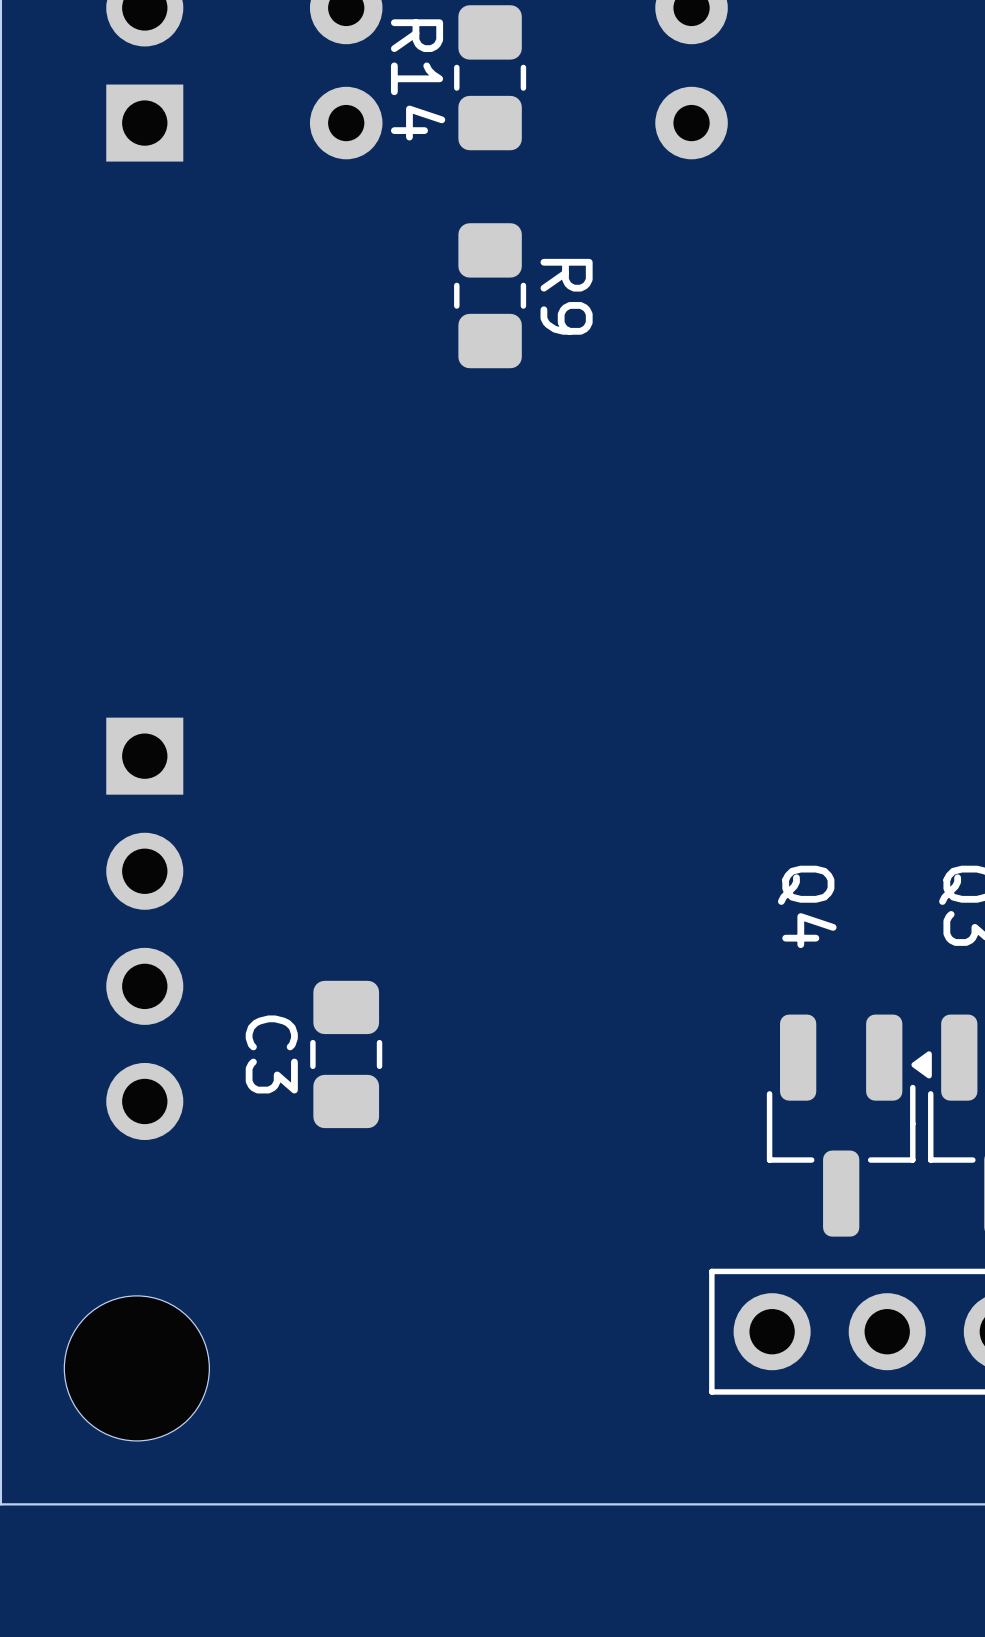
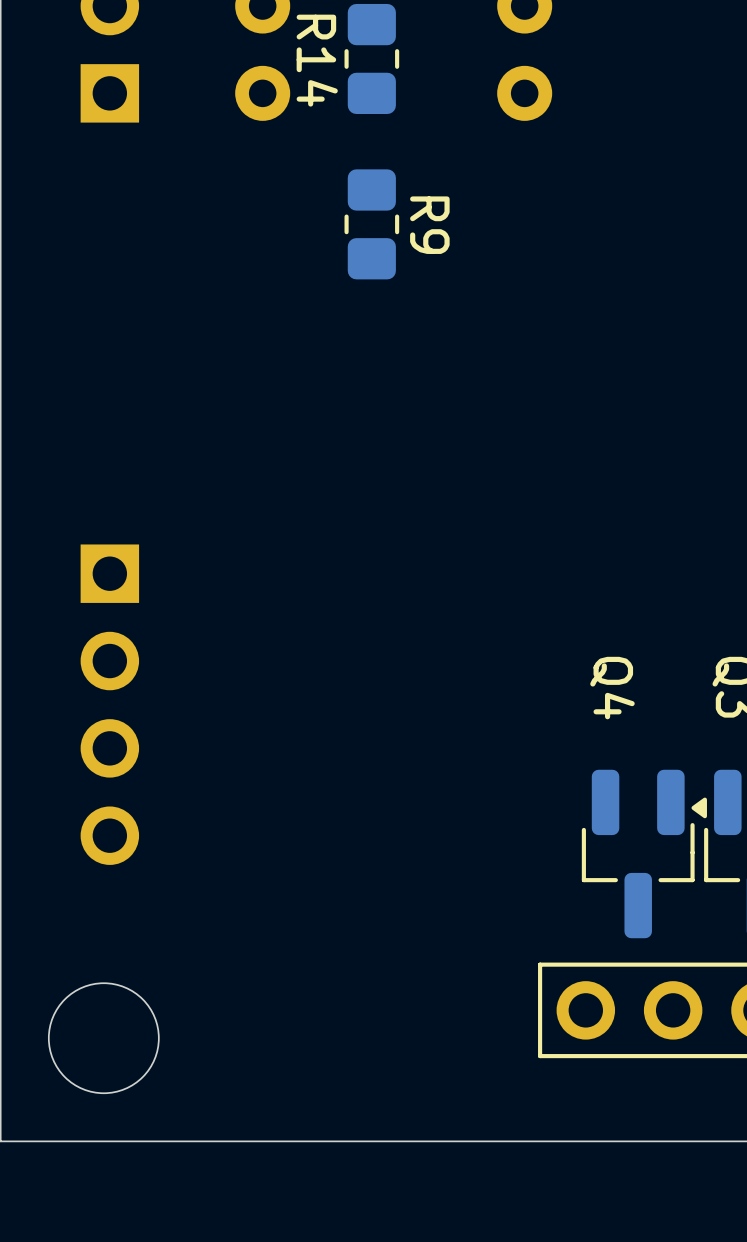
C3: (346, 1054) -> none

